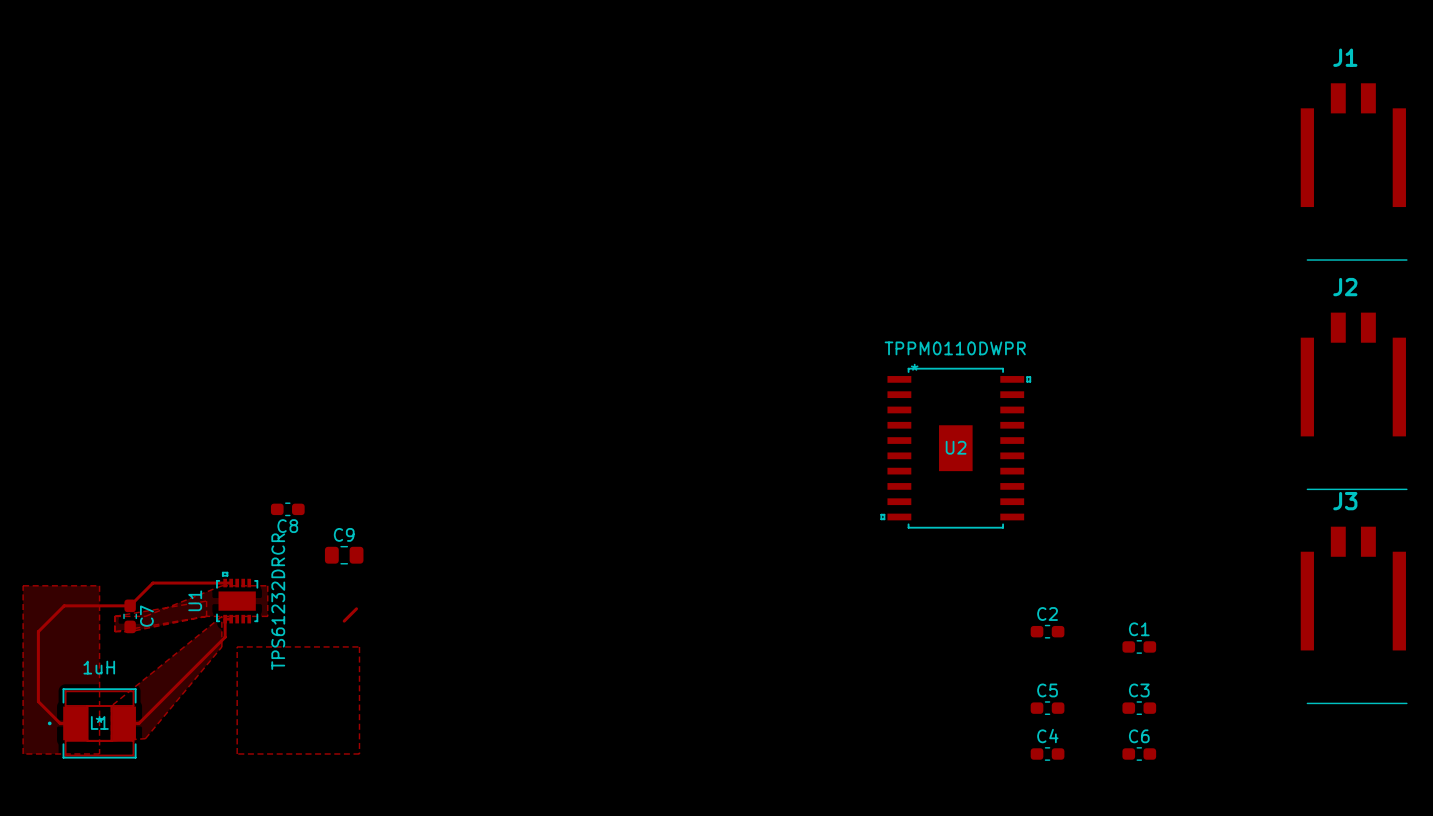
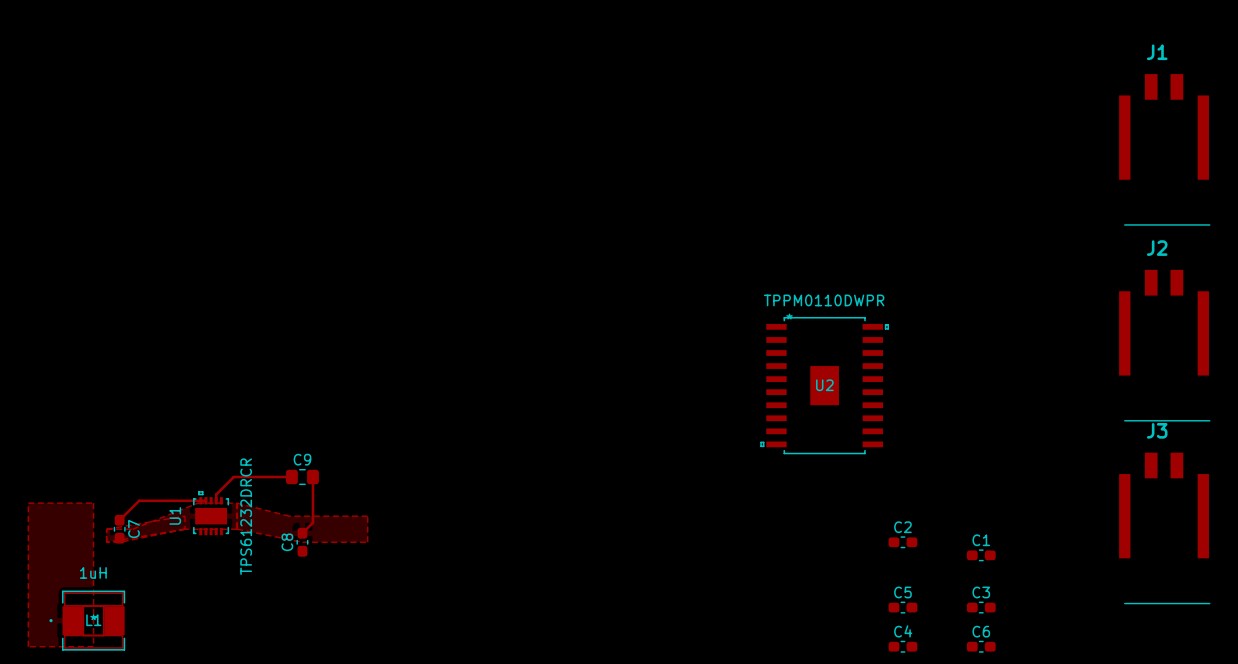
C8 rotation: 0° (287, 509) -> 90° clockwise (302, 542)
C8 position: (287, 509) -> (302, 542)
track: none -> (291, 477) (233, 477) (216, 494) (216, 500)
track: none -> (312, 477) (312, 522)
zone outline: none -> (237, 503) (289, 516) (367, 516) (367, 542) (302, 542) (237, 529)
track: (130, 605) (64, 605) (38, 631) (38, 701) (60, 723) (75, 723) -> none
zone outline: (221, 616) (111, 705) (111, 740) (145, 738) (221, 646) (221, 616) -> none
track: (231, 619) (225, 619) (225, 637) (138, 723) (124, 723) -> none
zone outline: (237, 646) (359, 646) (359, 753) (237, 753) (237, 646) -> none

